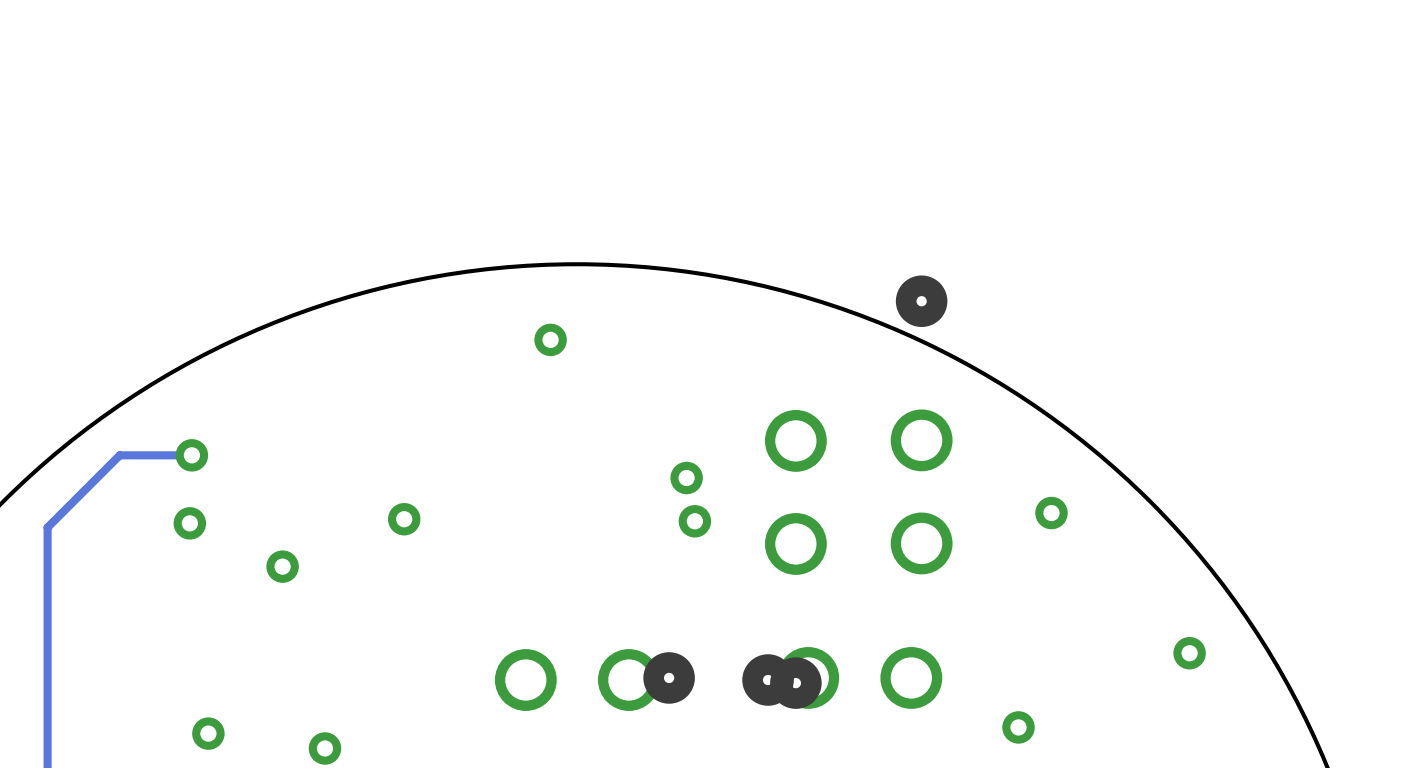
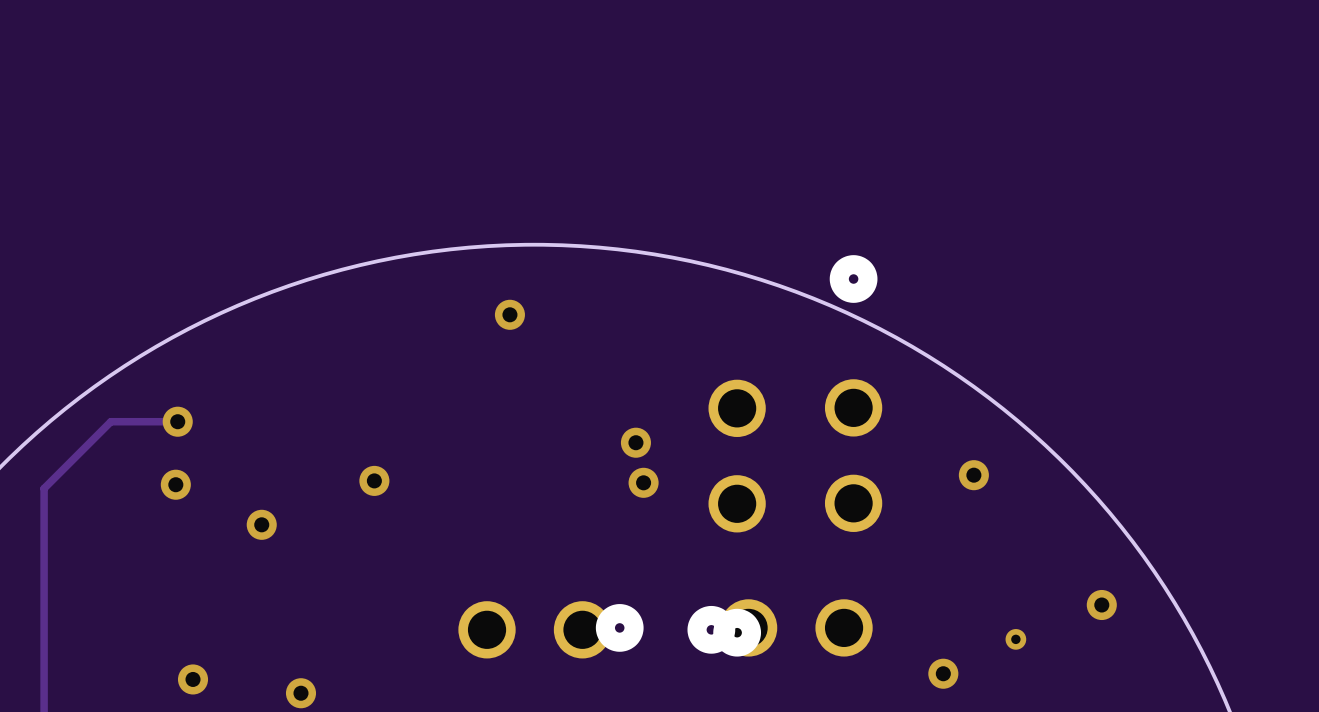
via: none -> (1015, 639)

